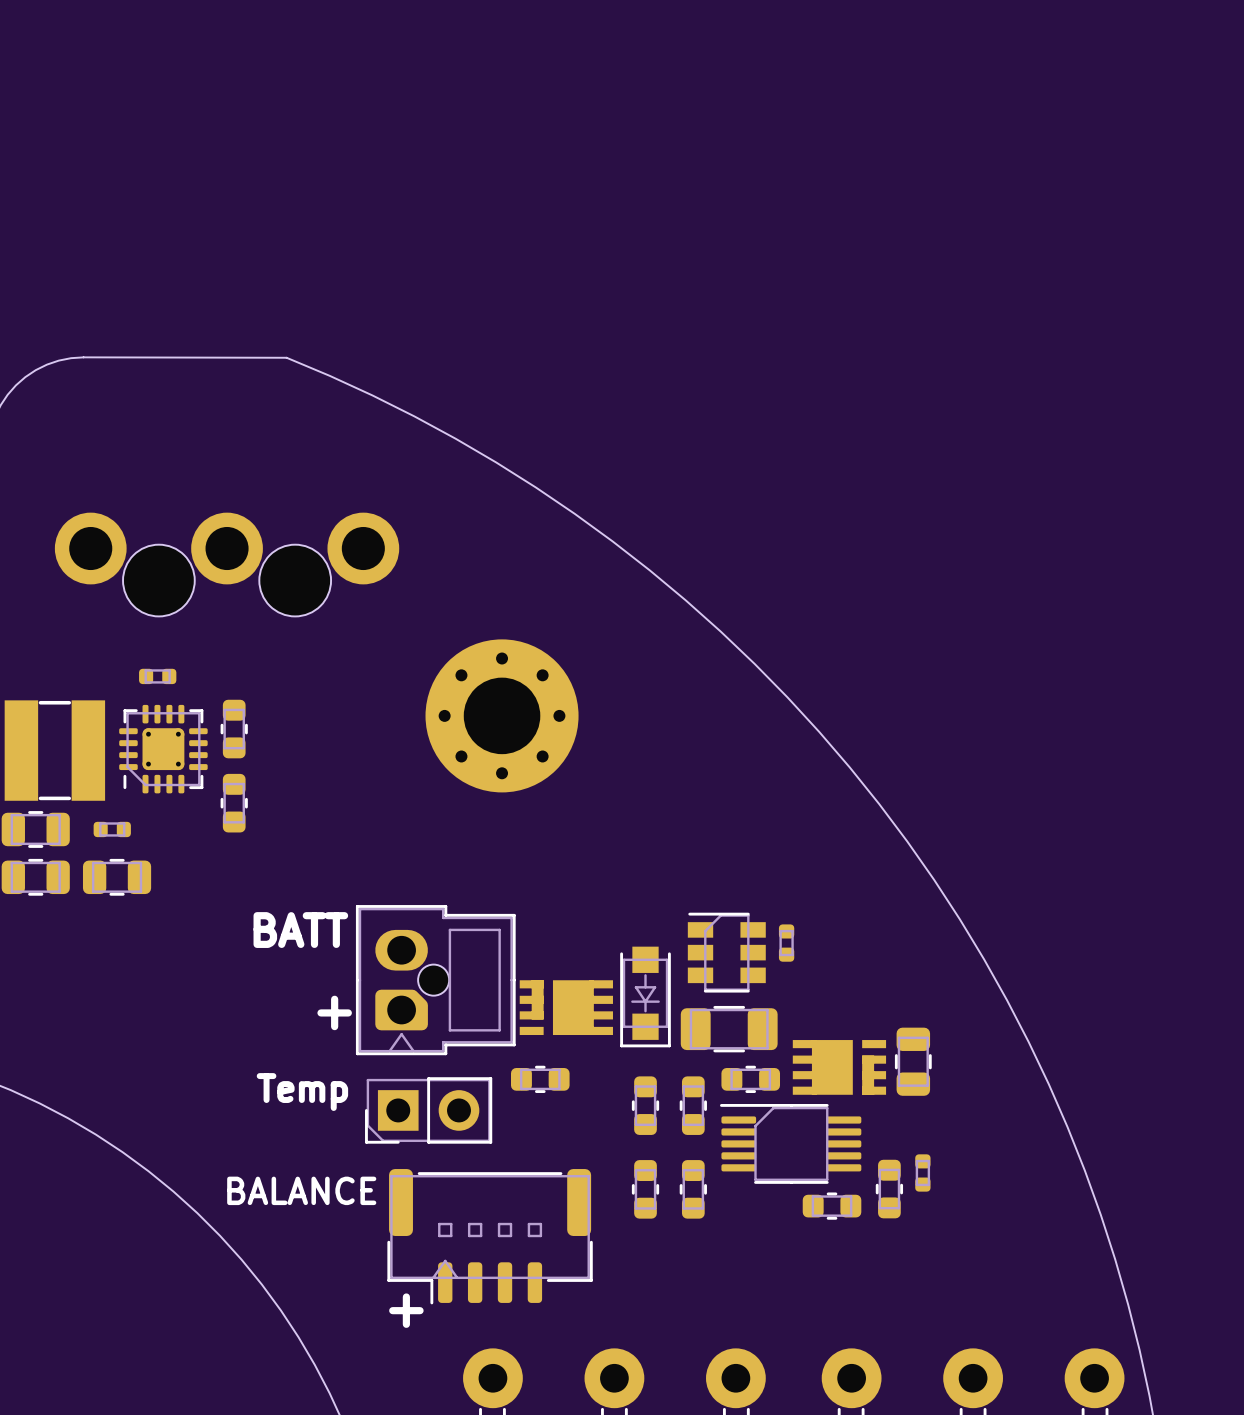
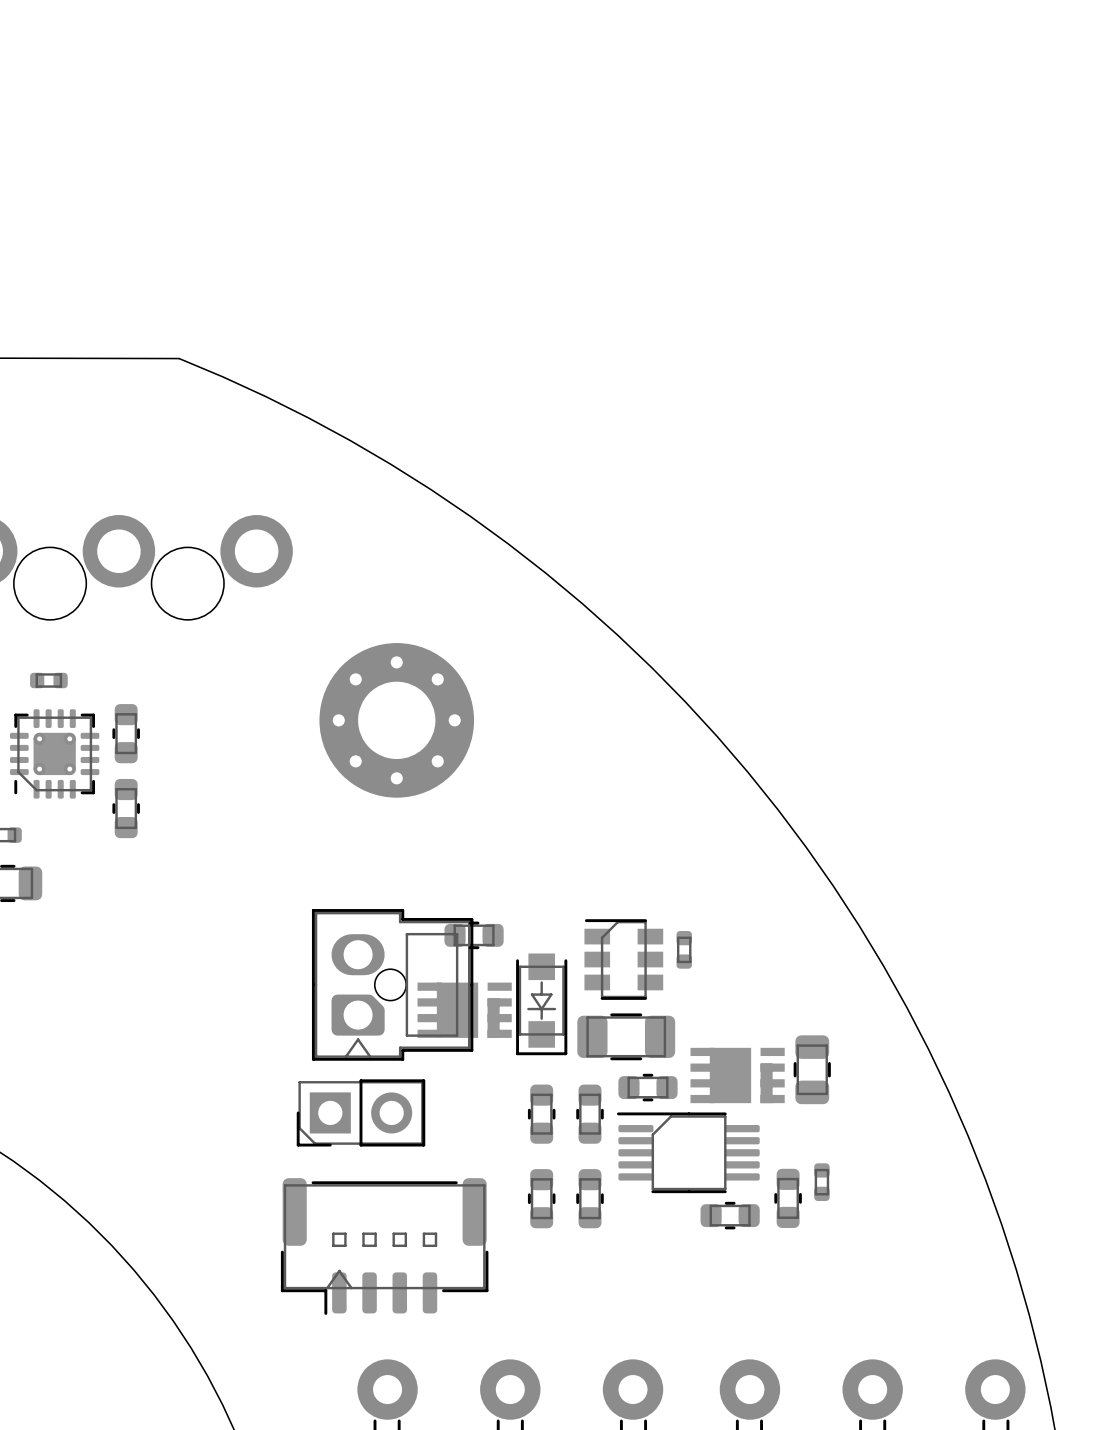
text: BATT (300, 930) -> none
part position: (435, 980) -> (392, 984)
part rotation: 0° (566, 1007) -> 180° (464, 1010)
text: + (334, 1012) -> none
part position: (540, 1079) -> (474, 935)
text: Temp (302, 1092) -> none
part position: (428, 1110) -> (360, 1112)
text: BALANCE (301, 1190) -> none
text: + (406, 1310) -> none

